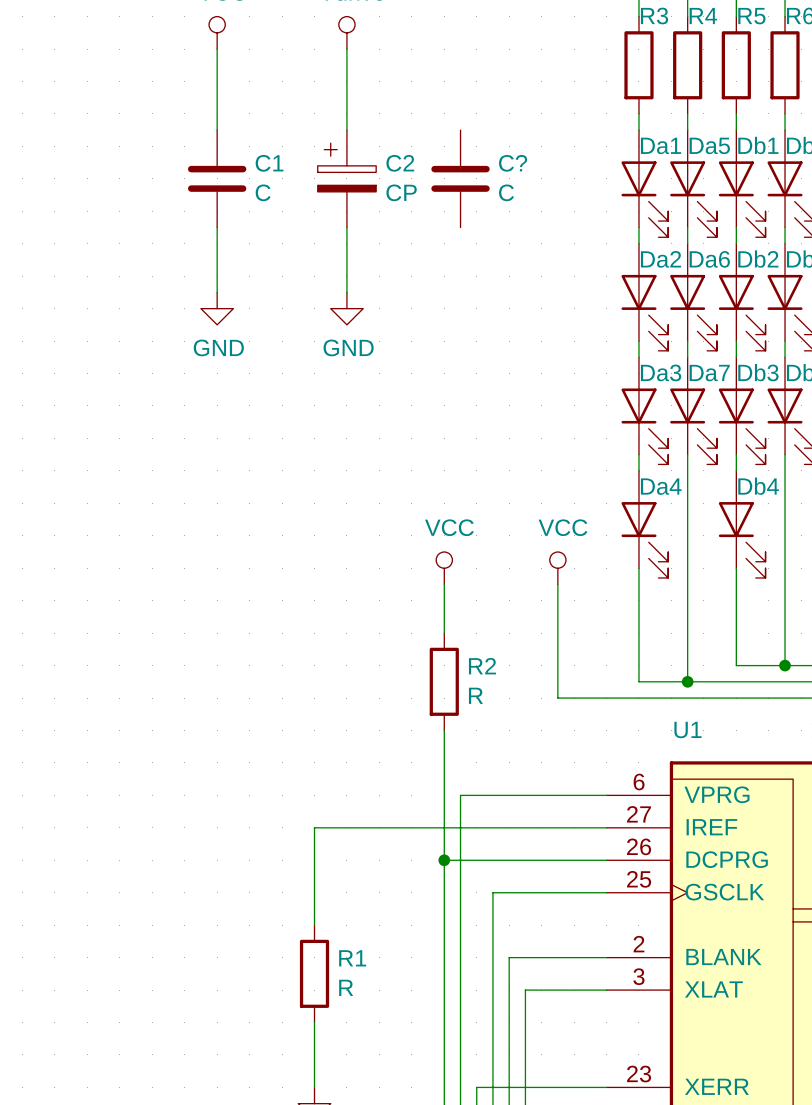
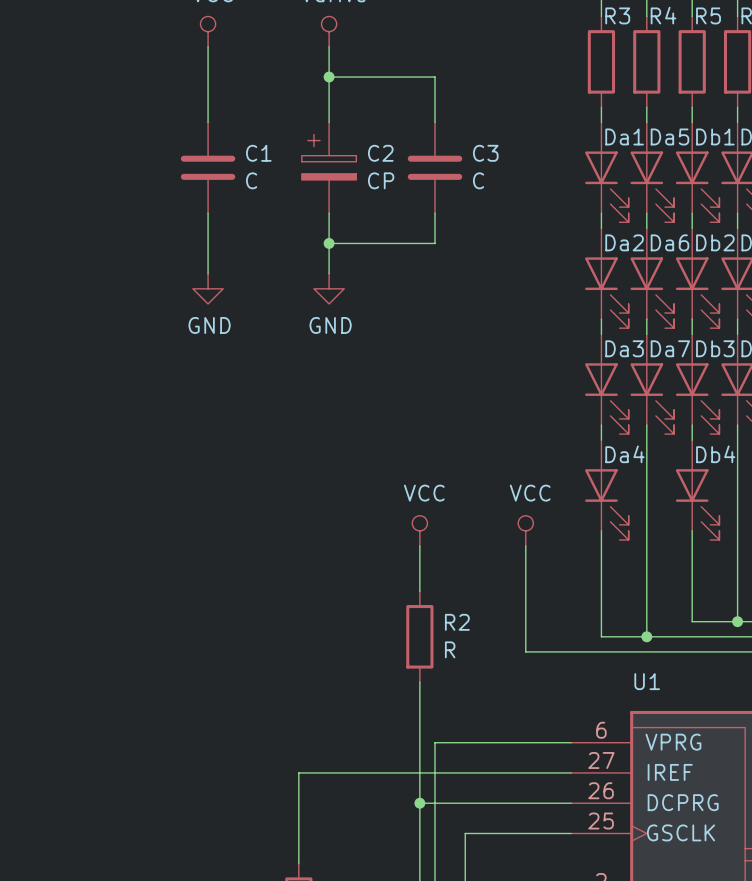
wire: none -> (329, 77) (435, 77) (435, 122)
junction: none -> (329, 77)
C? name: C? (513, 163) -> C3 (485, 153)
wire: none -> (435, 213) (435, 243) (329, 243)
junction: none -> (329, 243)

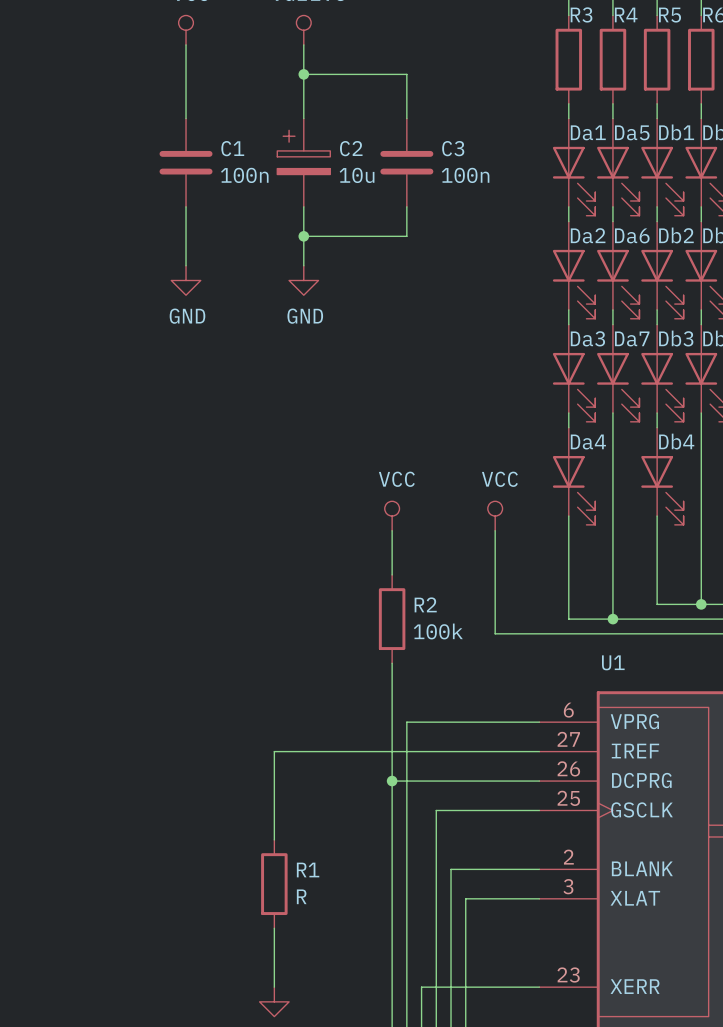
C1 value: C (251, 180) -> 100n (244, 175)
C2 value: CP (381, 180) -> 10u (357, 175)
C3 value: C (478, 180) -> 100n (465, 175)
R2 value: R (450, 649) -> 100k (438, 631)

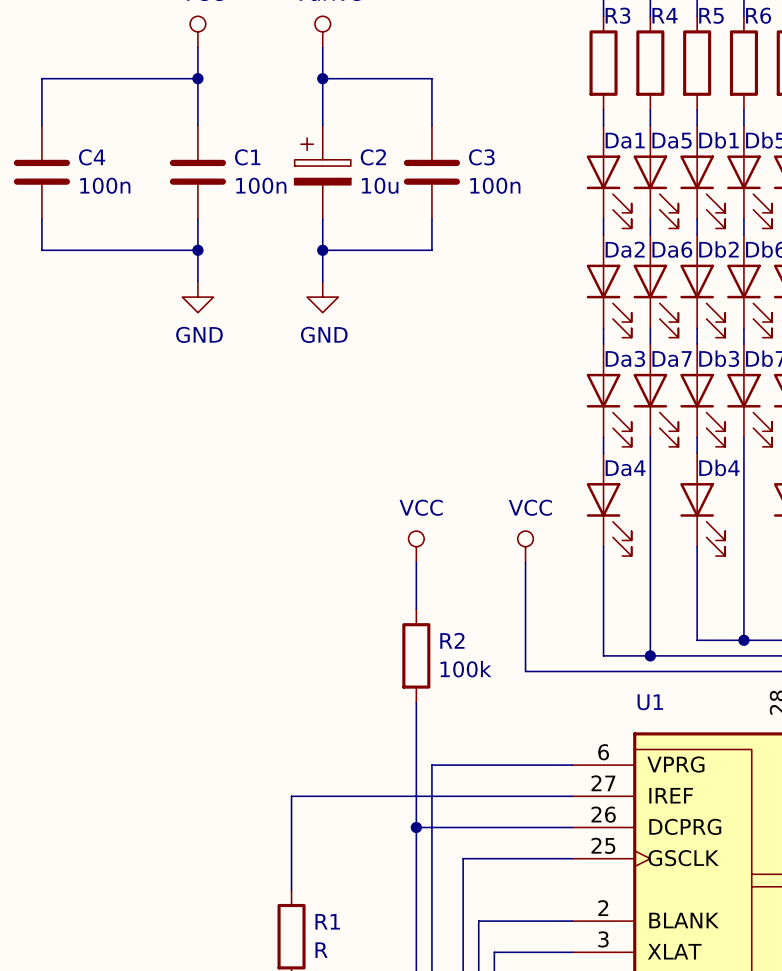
wire: none -> (197, 78) (41, 78) (41, 125)
junction: none -> (197, 78)
C4: none -> 100n (41, 172)
wire: none -> (41, 219) (41, 250) (197, 250)
junction: none -> (197, 250)

